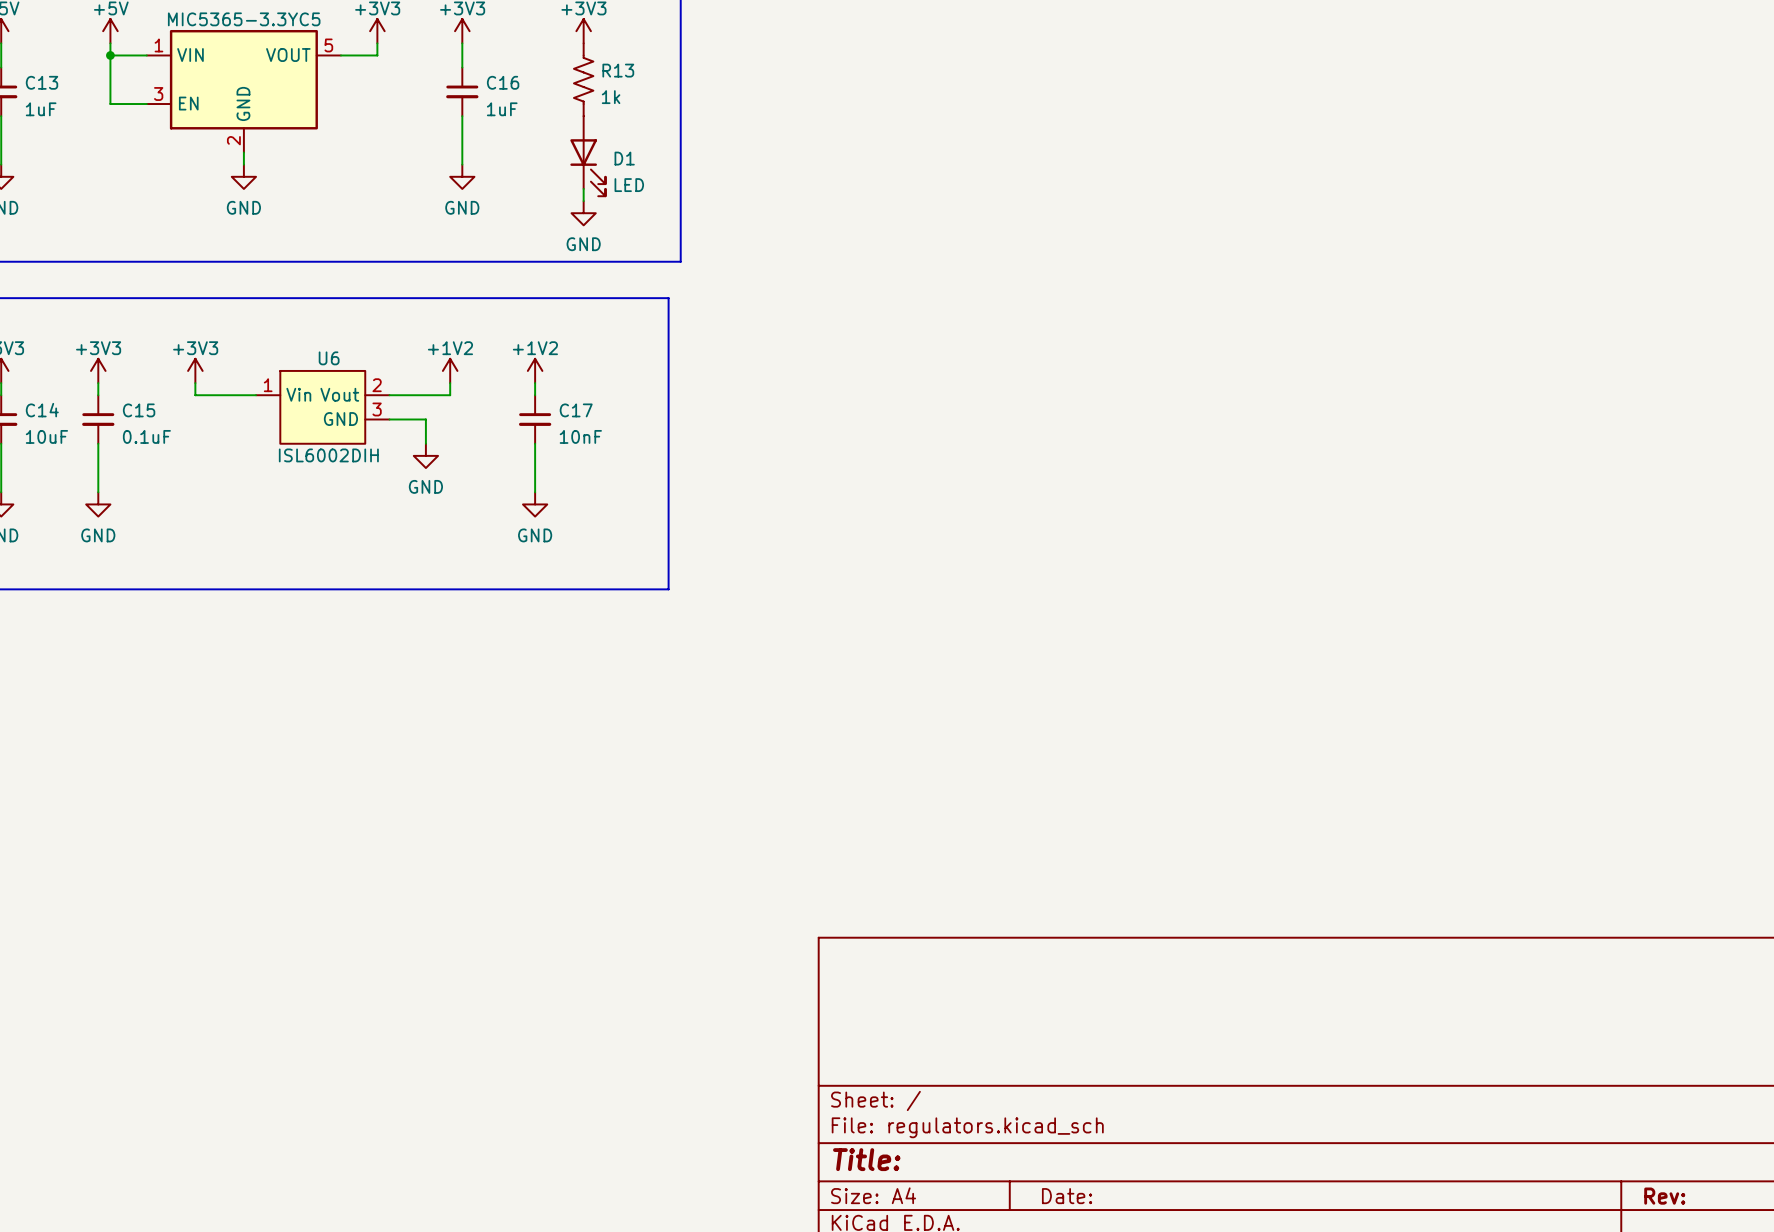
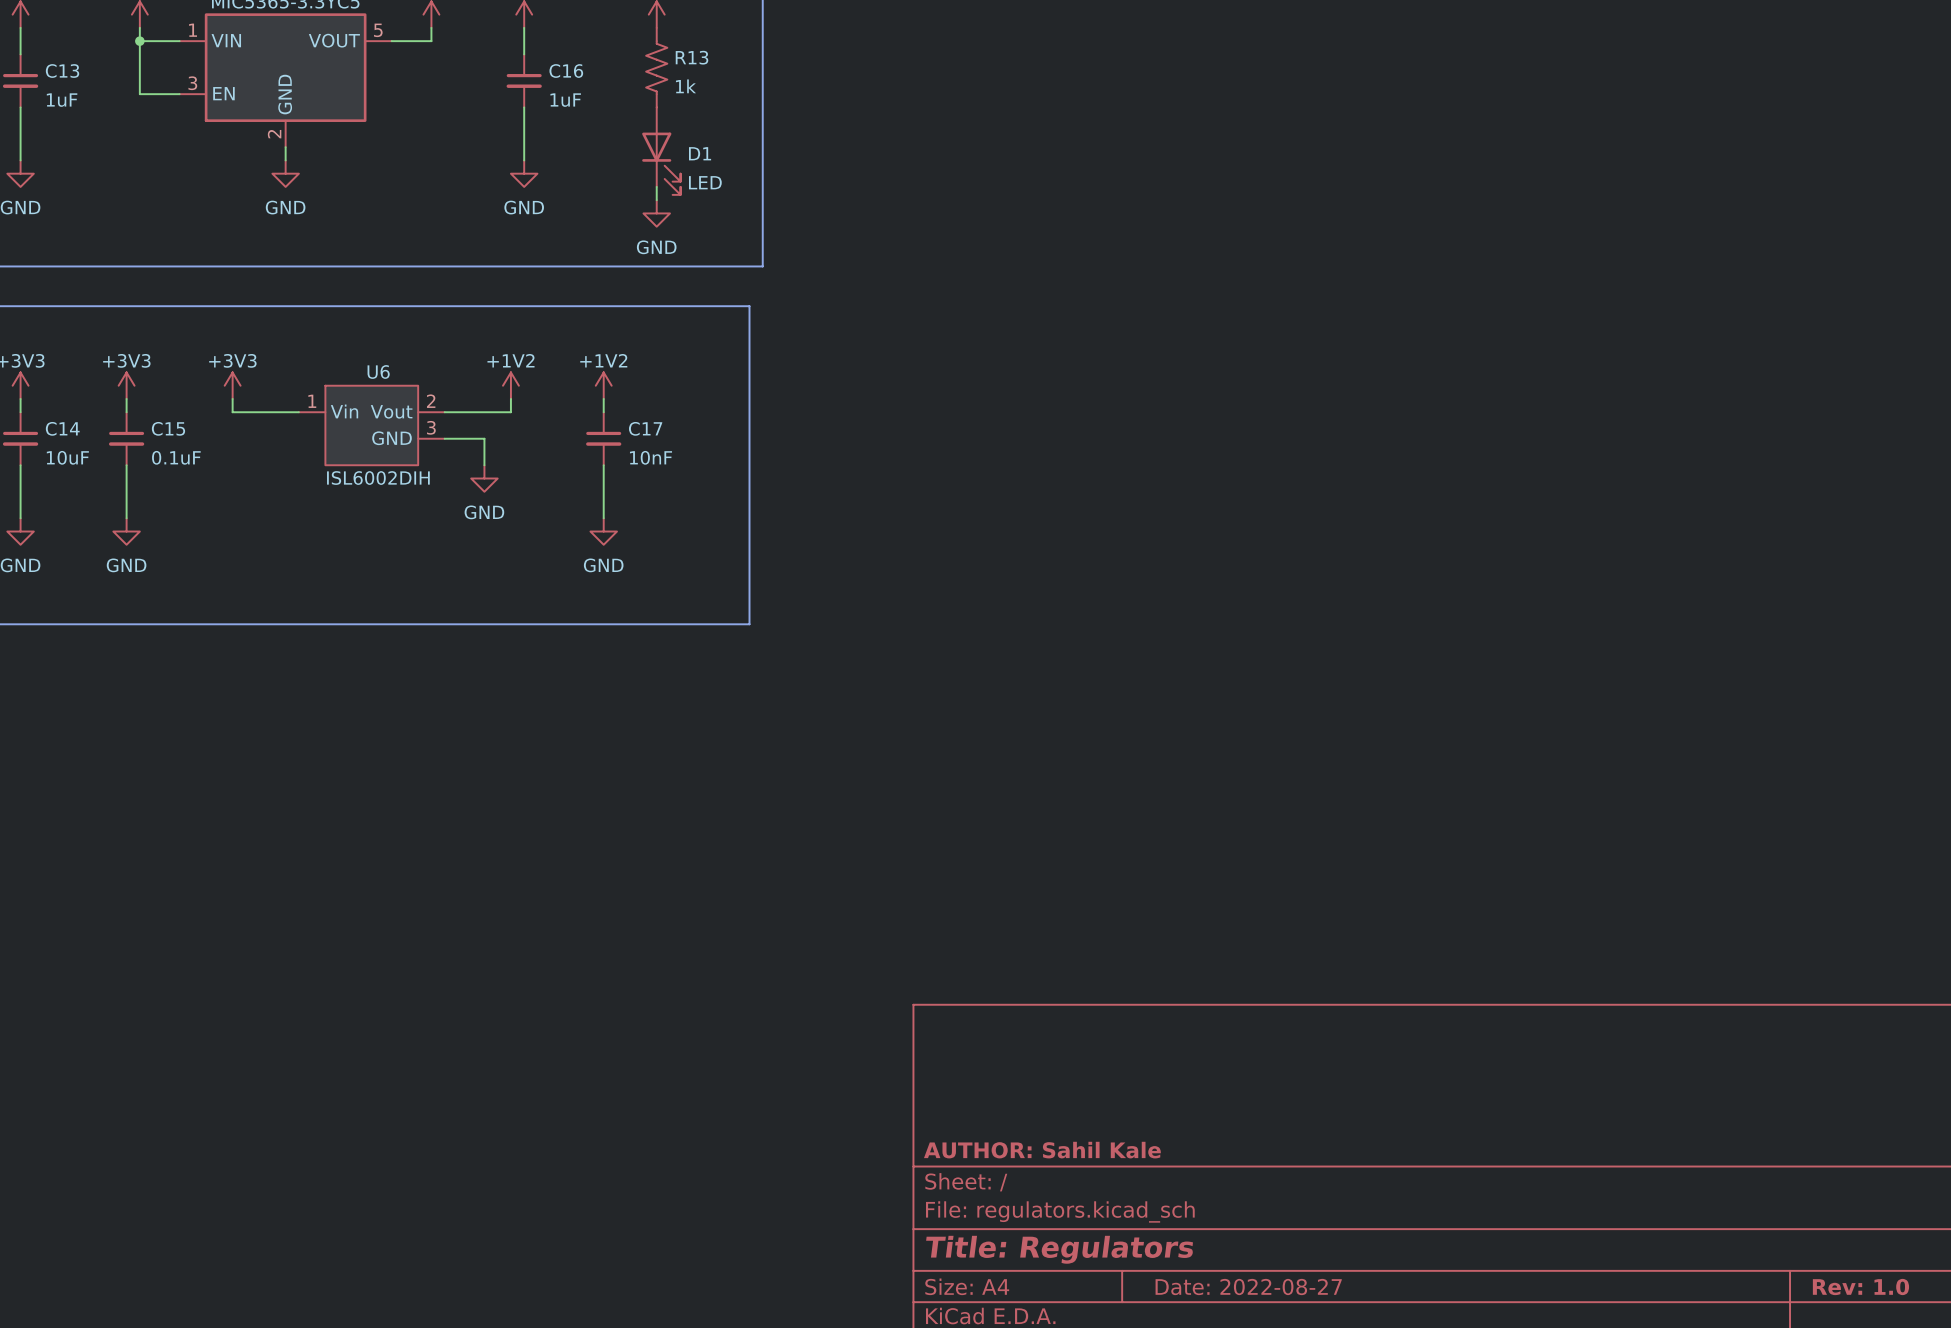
title block: none -> AUTHOR: Sahil Kale (1042, 1150)
title block: Title: (866, 1159) -> Title: Regulators (1059, 1249)
title block: Date: (1067, 1196) -> Date: 2022-08-27 (1248, 1286)
title block: Rev: (1664, 1196) -> Rev: 1.0 (1860, 1286)

